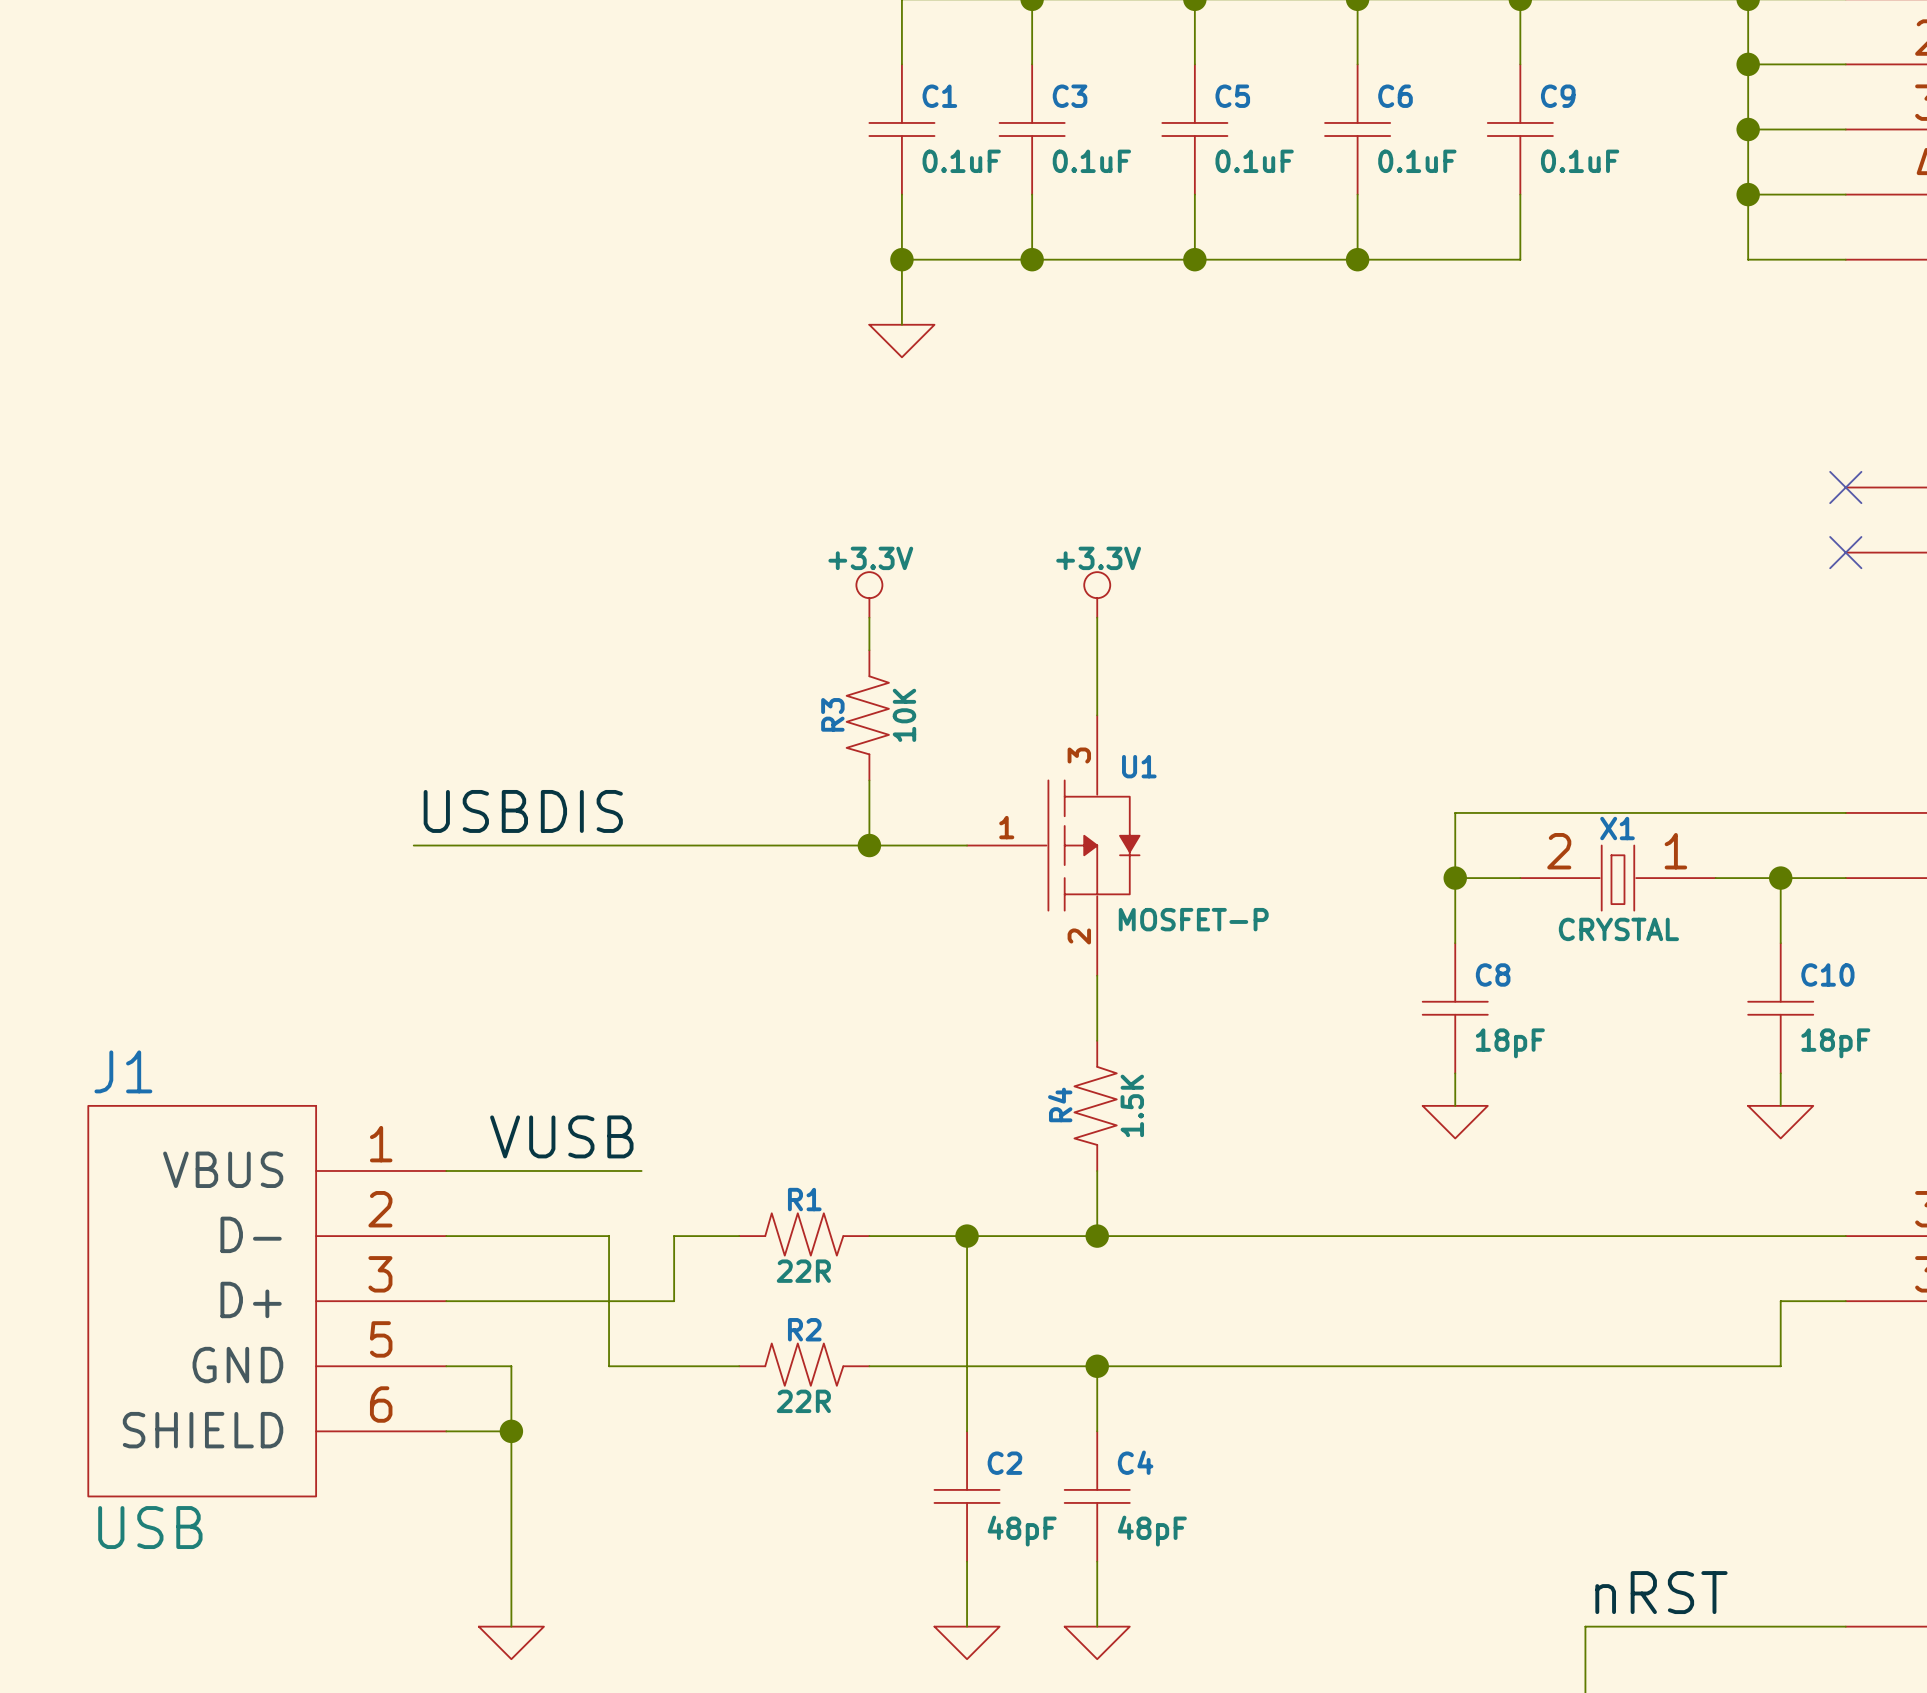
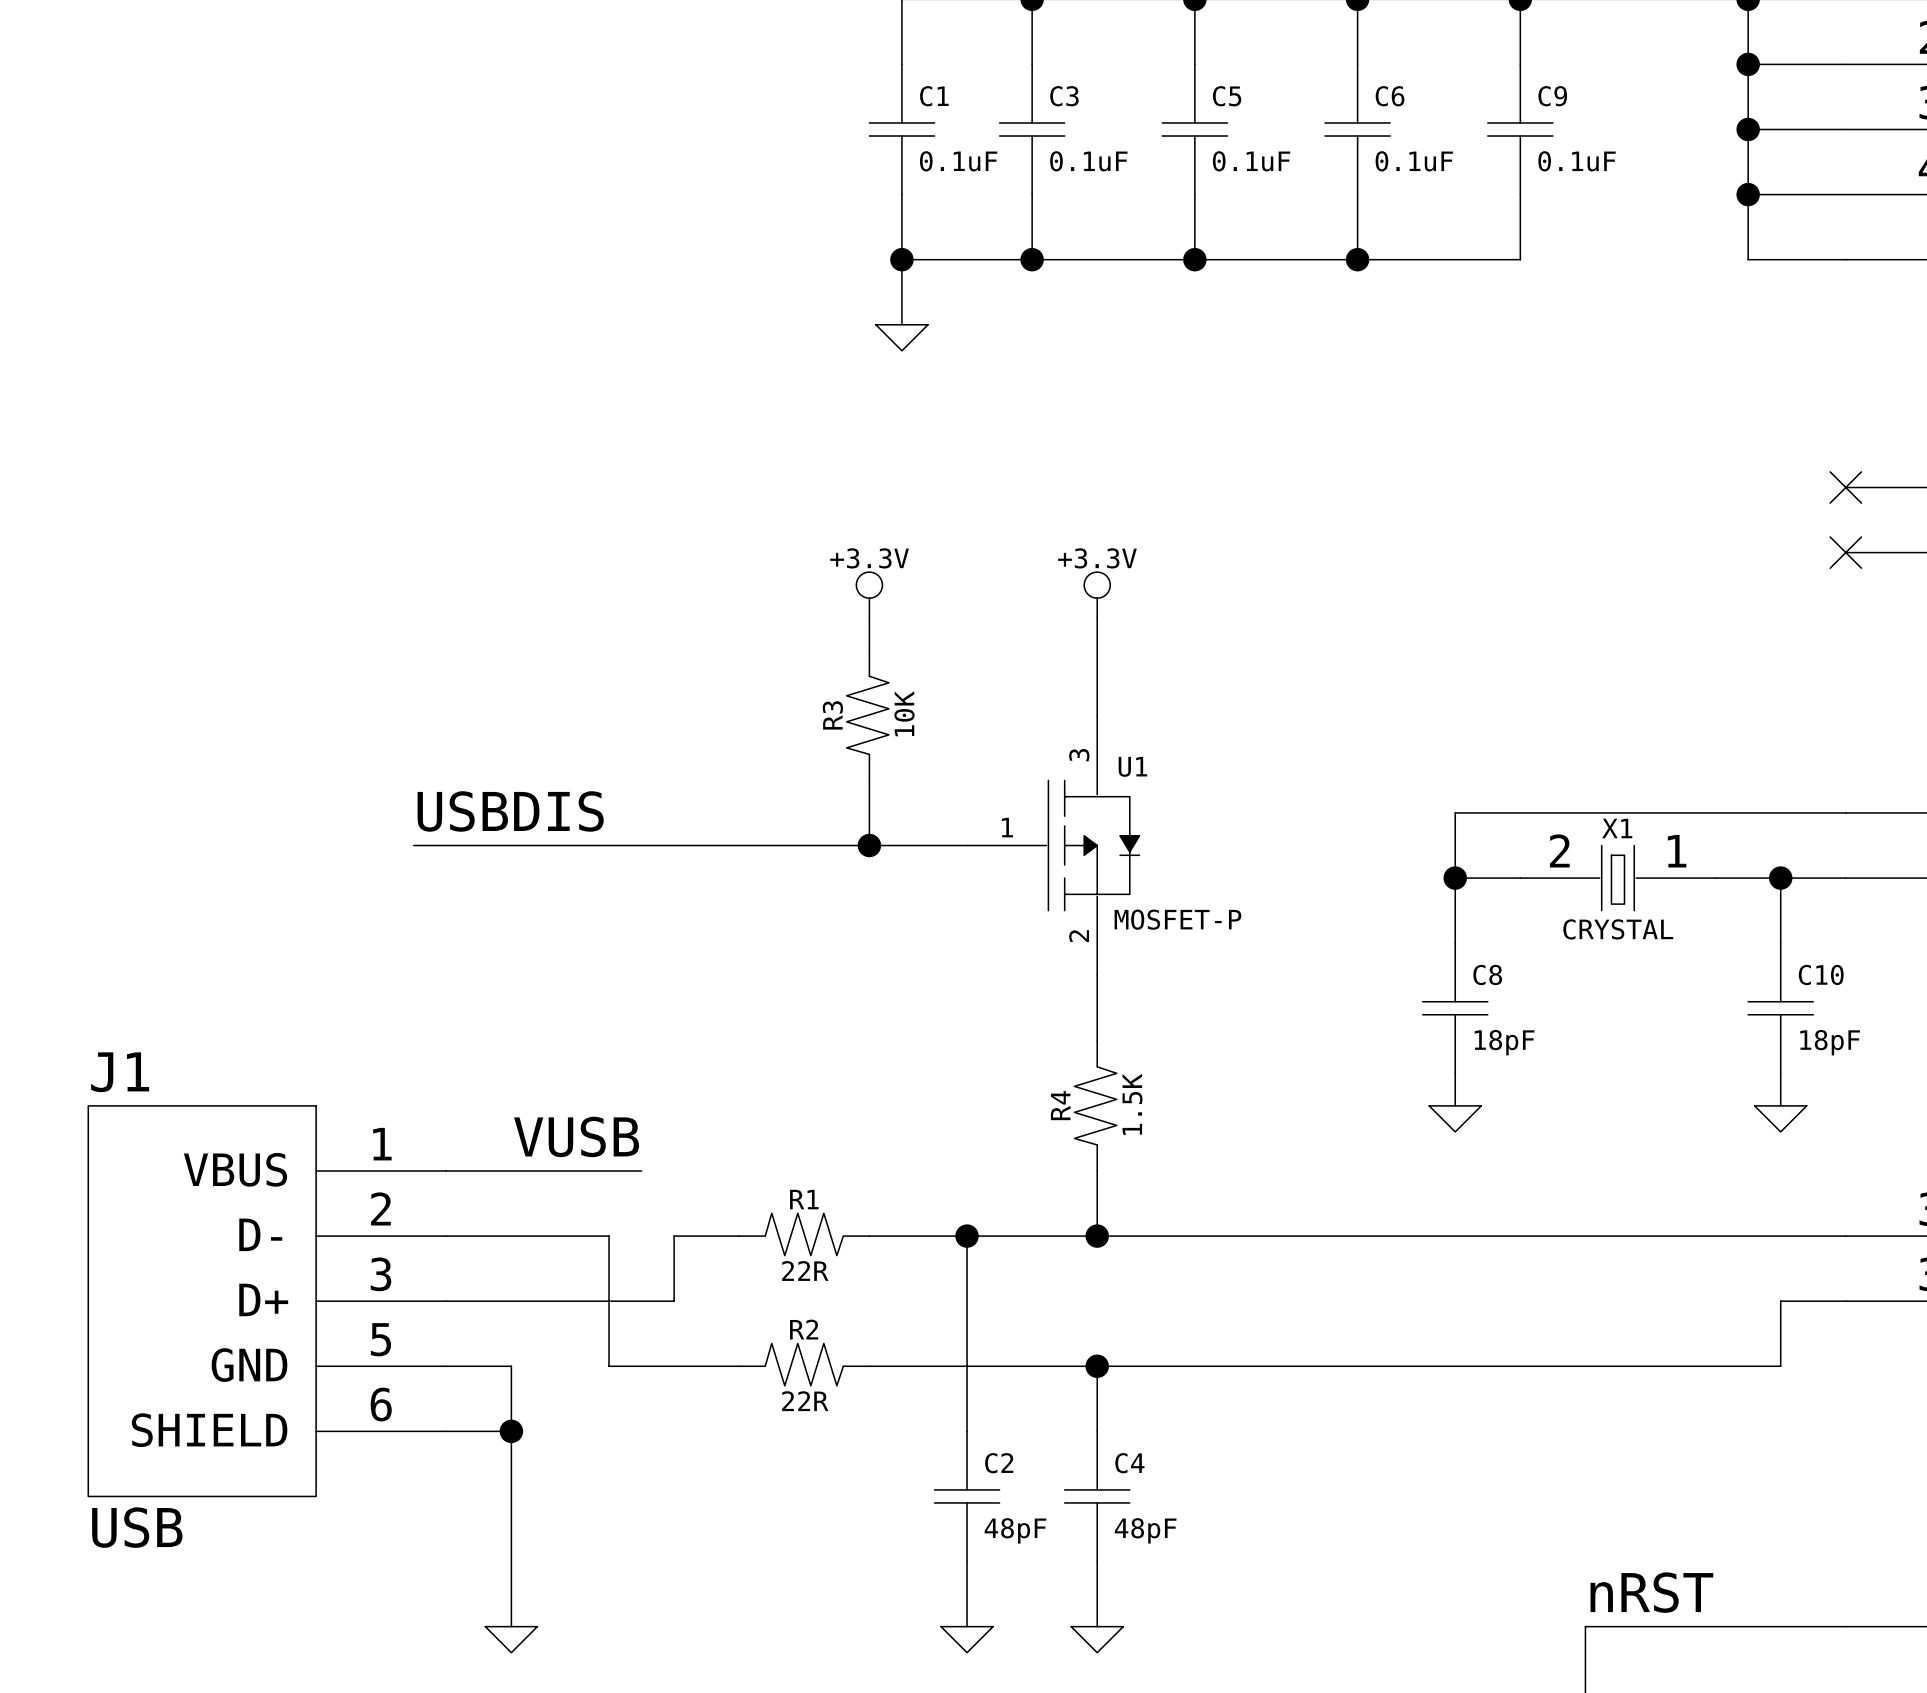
power symbol shape: [869, 324, 935, 358] -> [875, 324, 928, 351]
power symbol shape: [1422, 1105, 1488, 1139] -> [1429, 1105, 1482, 1132]
power symbol shape: [1748, 1105, 1814, 1139] -> [1754, 1105, 1807, 1132]
power symbol shape: [478, 1626, 544, 1660] -> [485, 1626, 538, 1653]
power symbol shape: [934, 1626, 1000, 1660] -> [941, 1626, 994, 1653]
power symbol shape: [1064, 1626, 1130, 1660] -> [1071, 1626, 1124, 1653]

